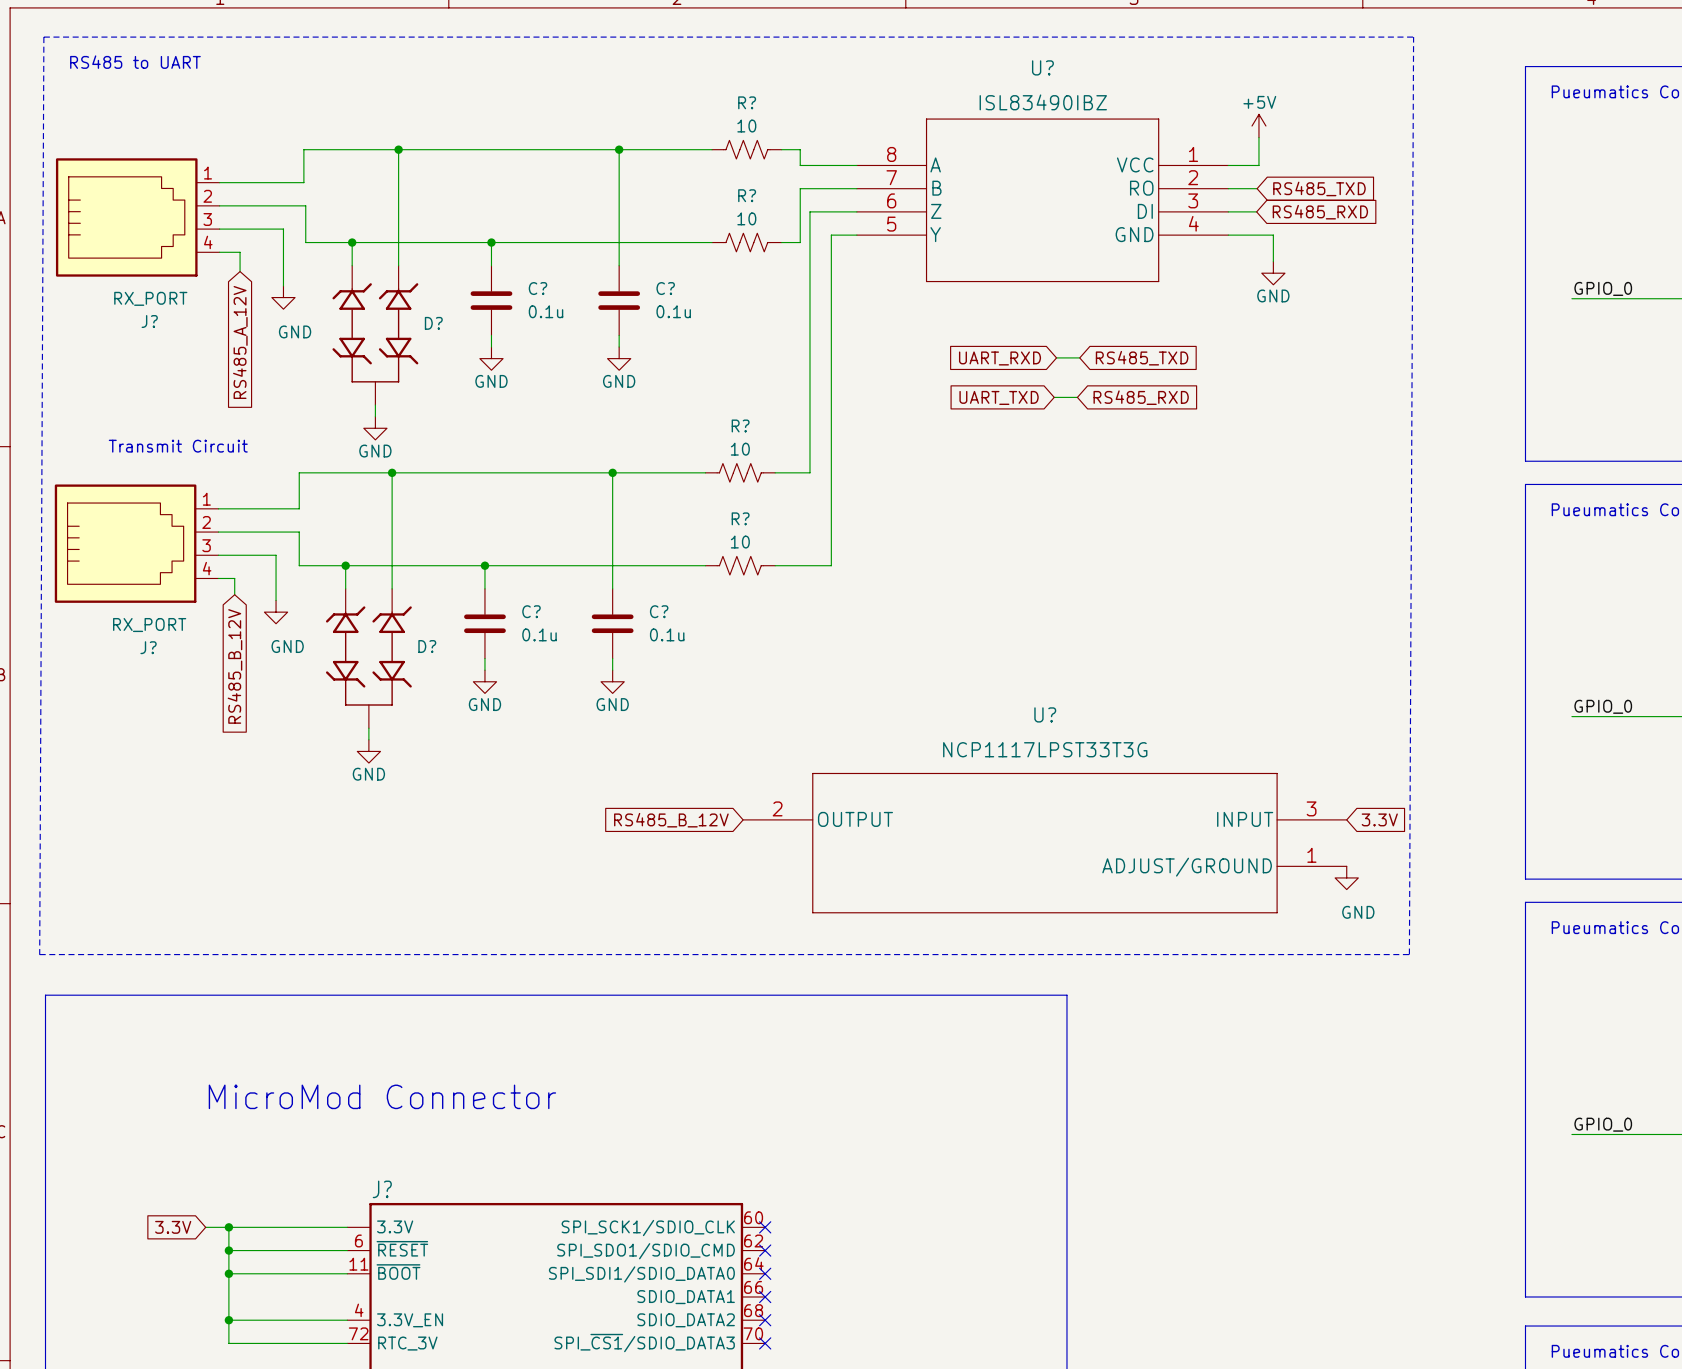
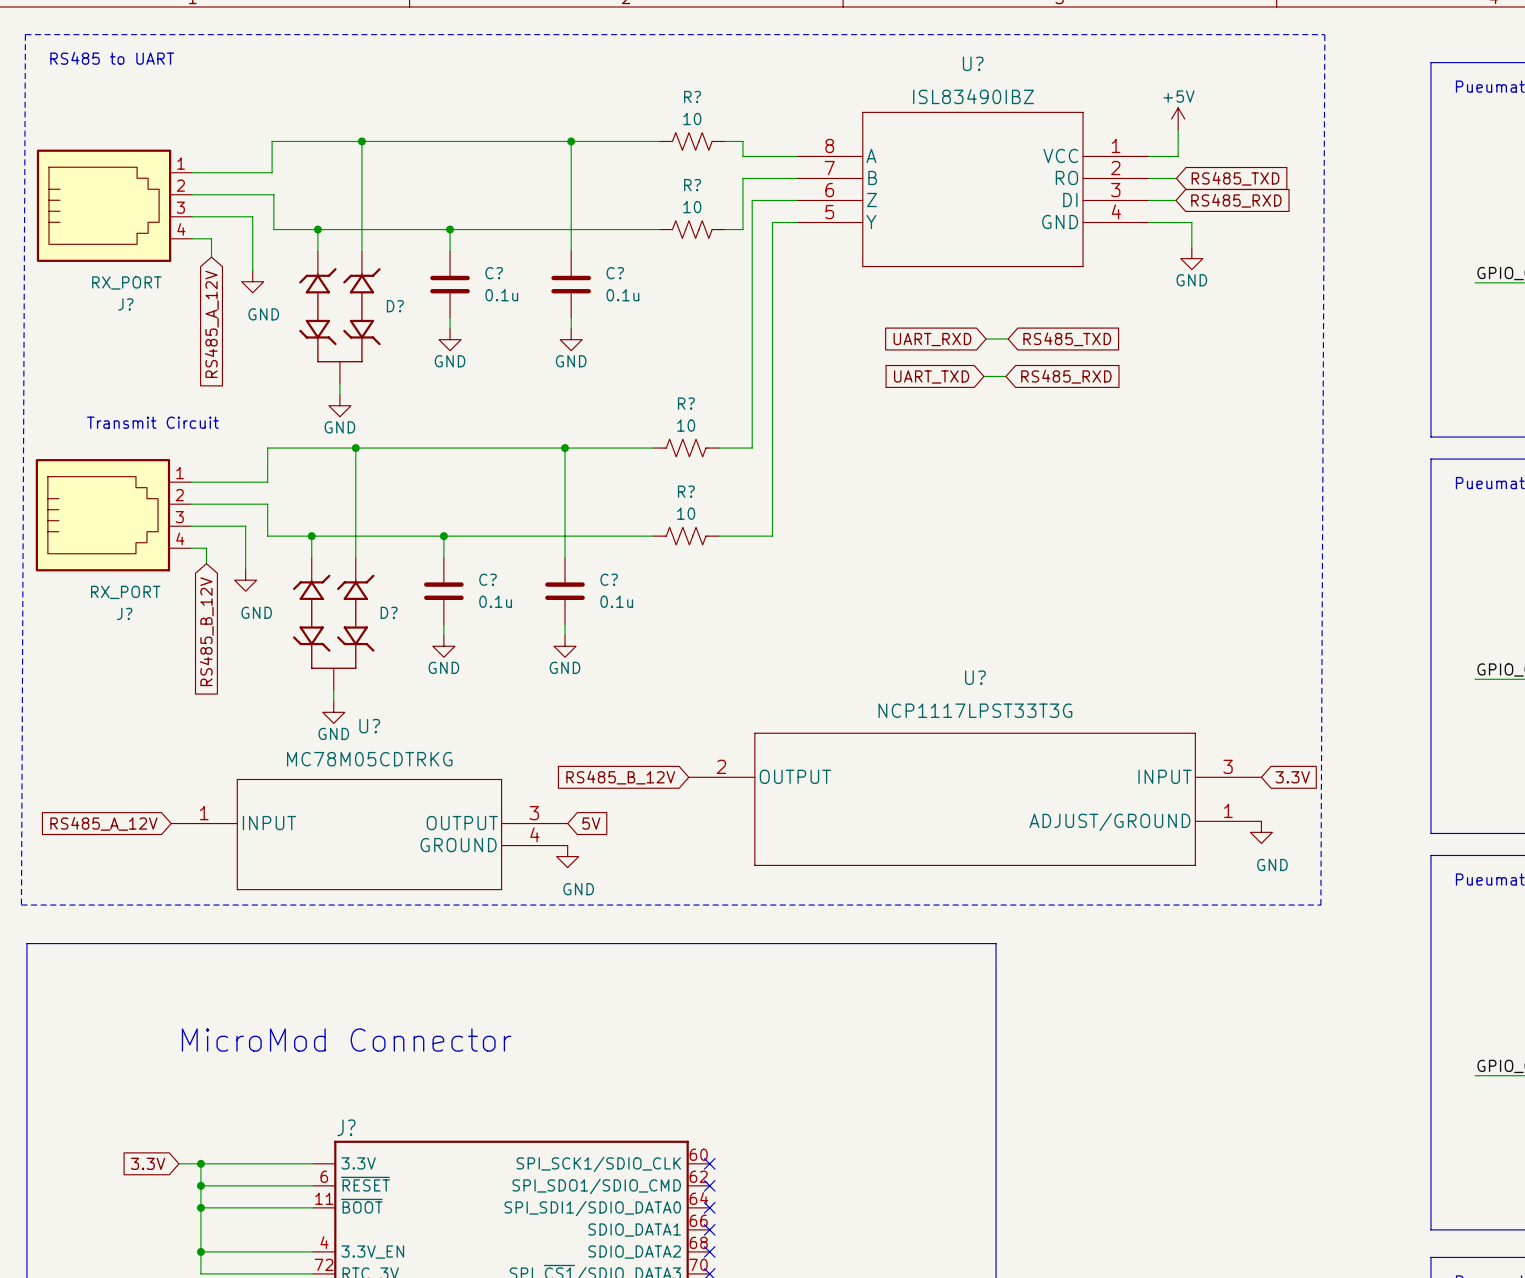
global label: none -> RS485_A_12V (103, 823)
global label: none -> 5V (591, 823)
U?: none -> MC78M05CDTRKG (369, 834)
power symbol: none -> GND (567, 856)

